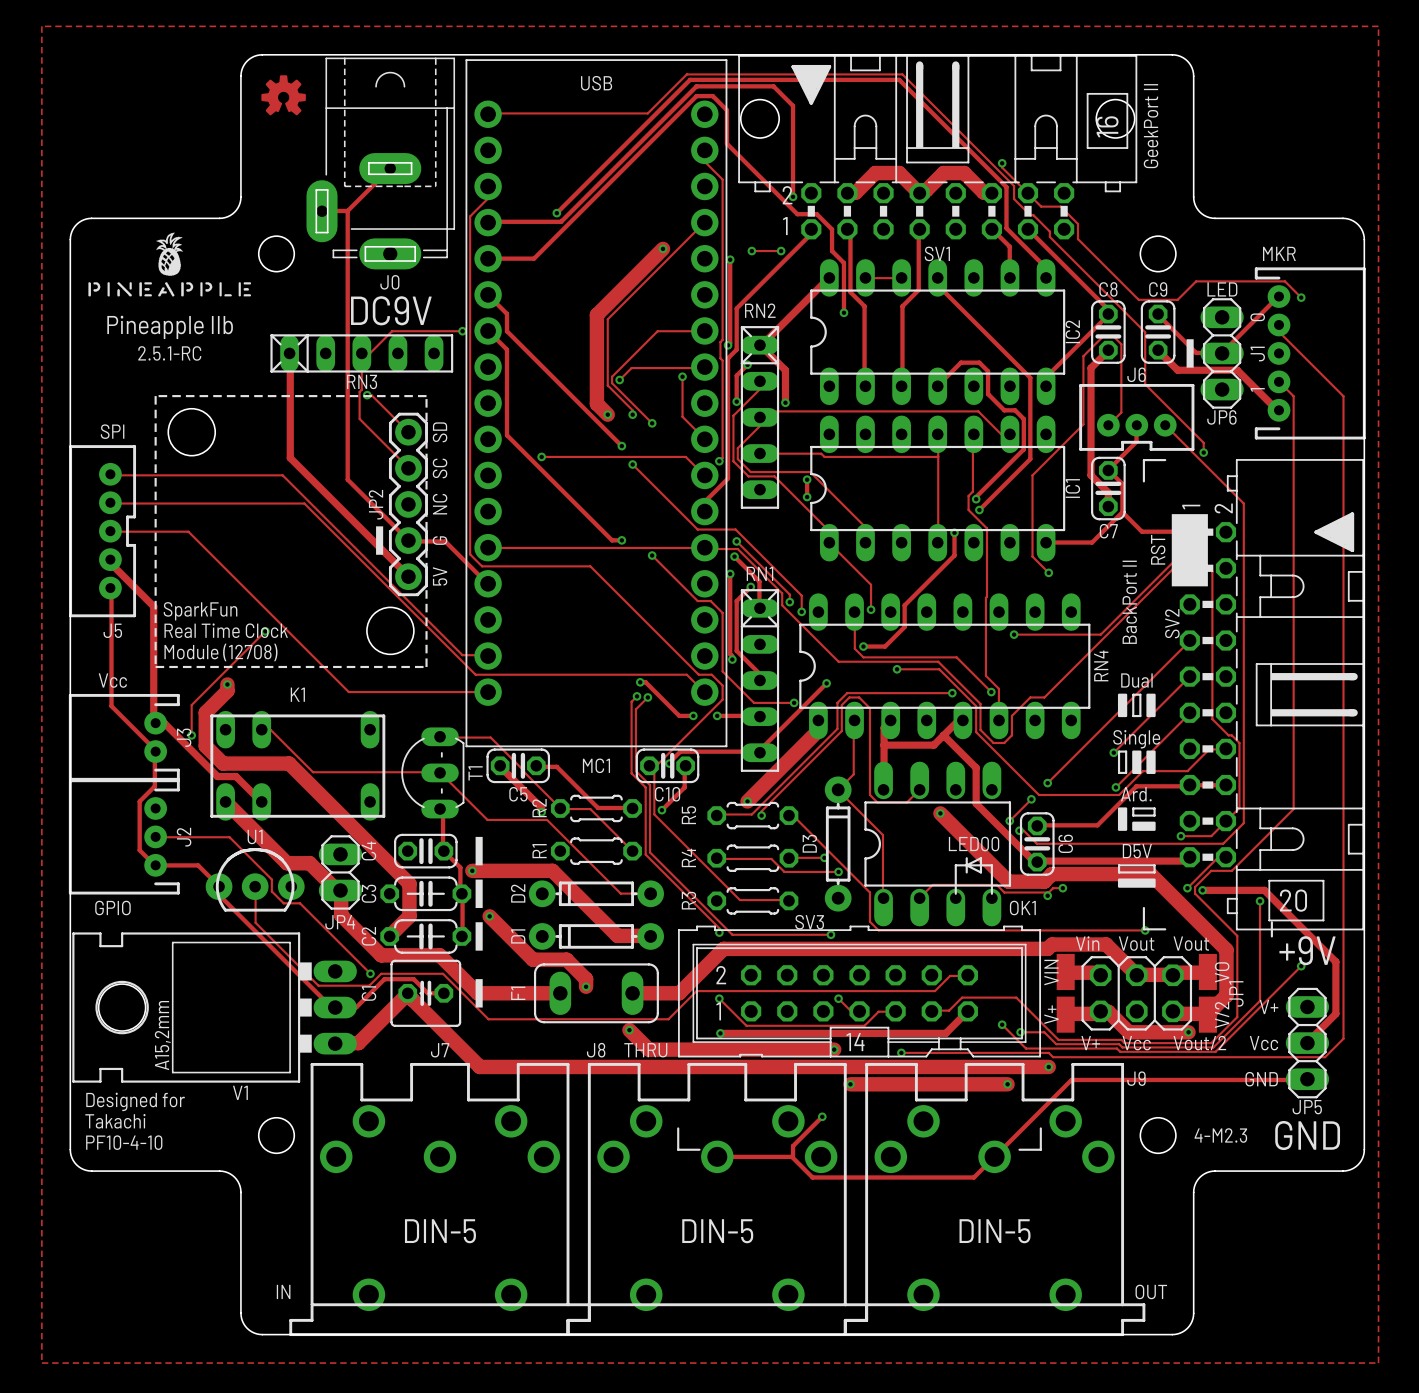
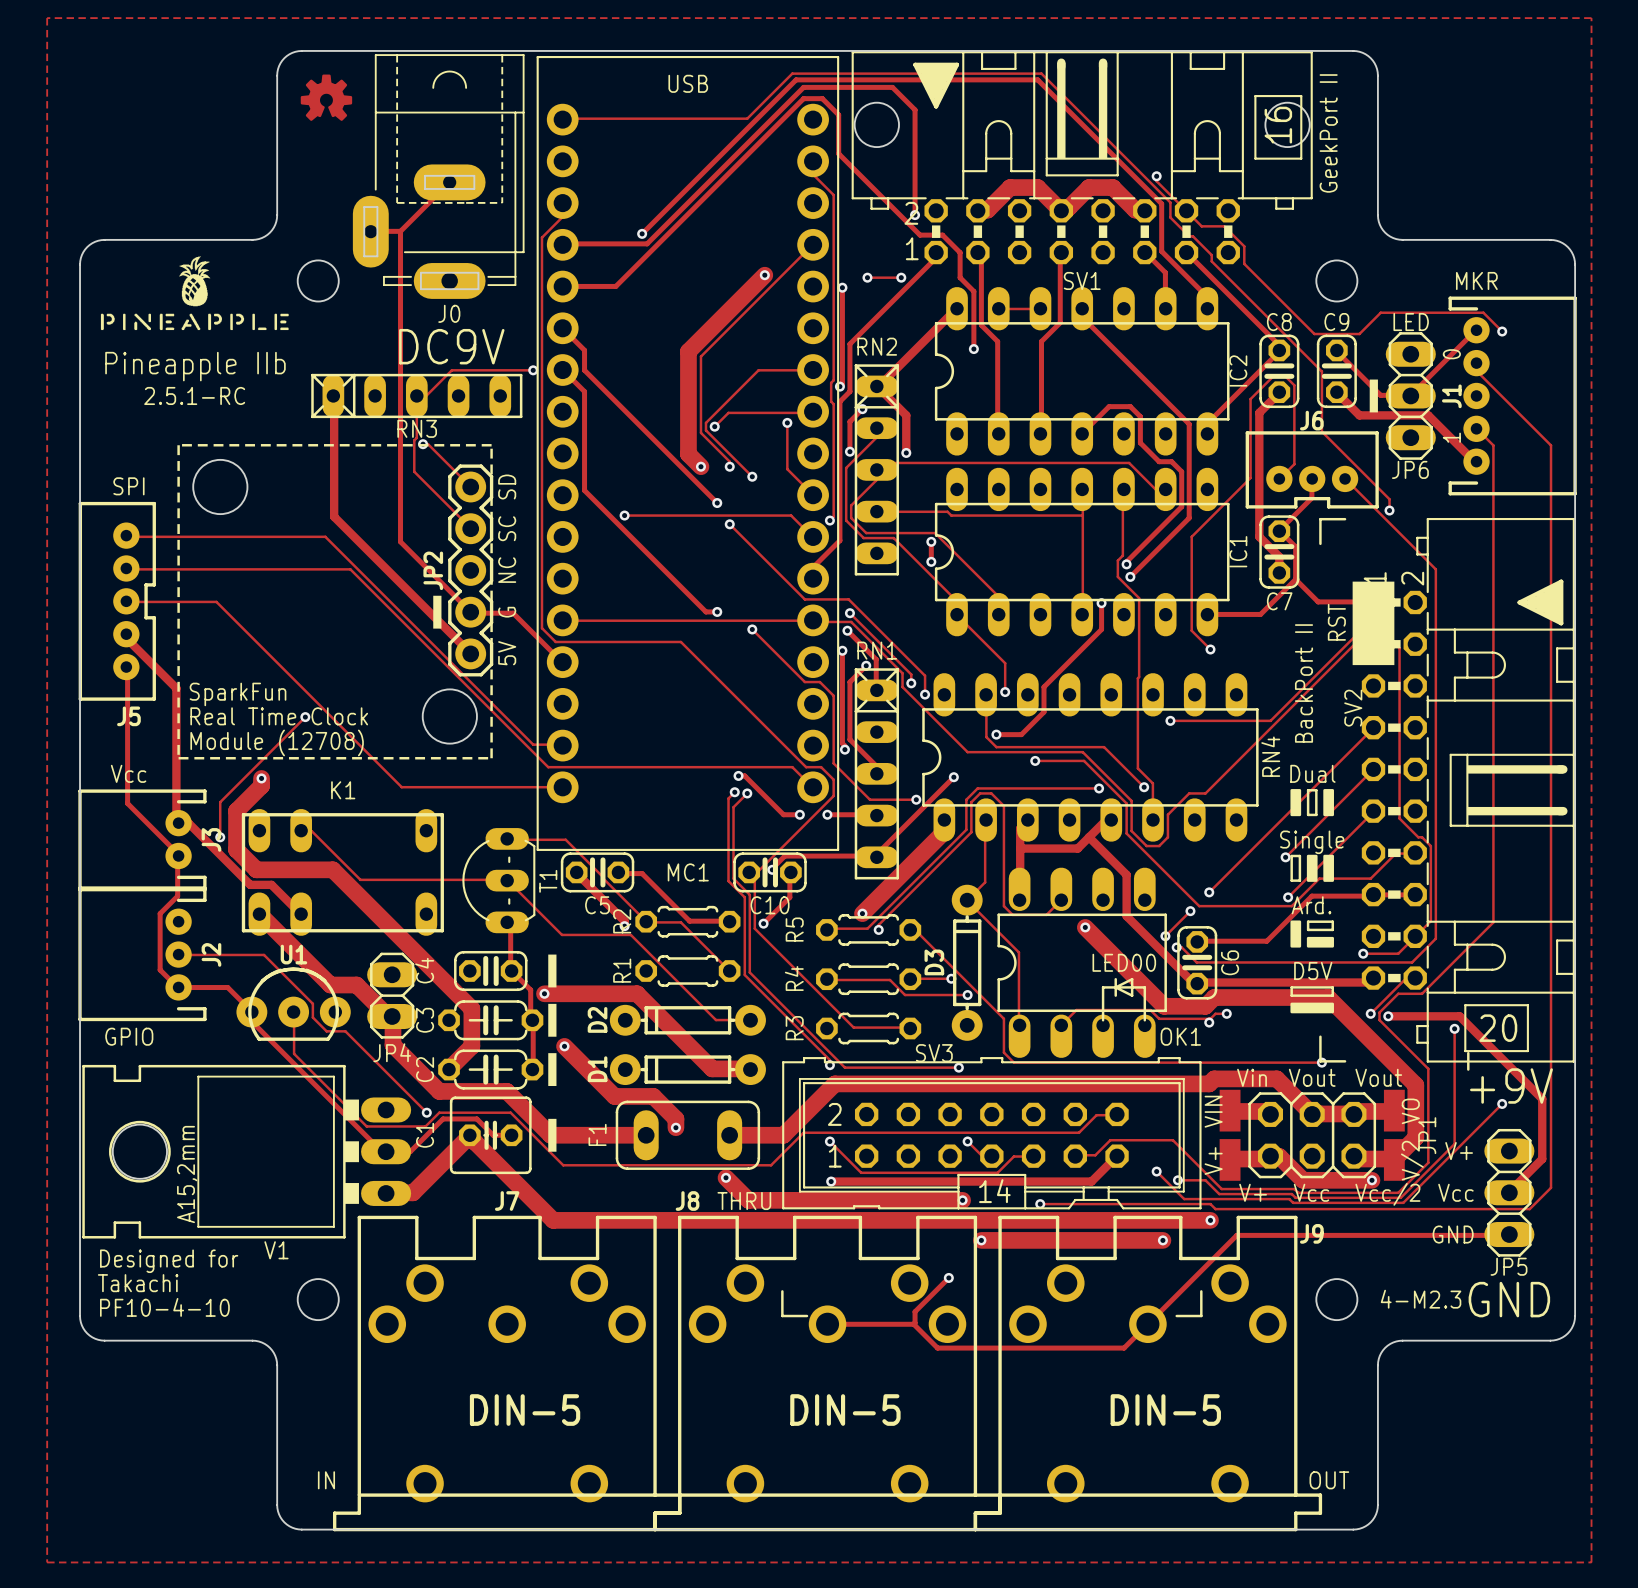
text: Vout/2 (1199, 1043) -> Vcc/2 (1387, 1194)

